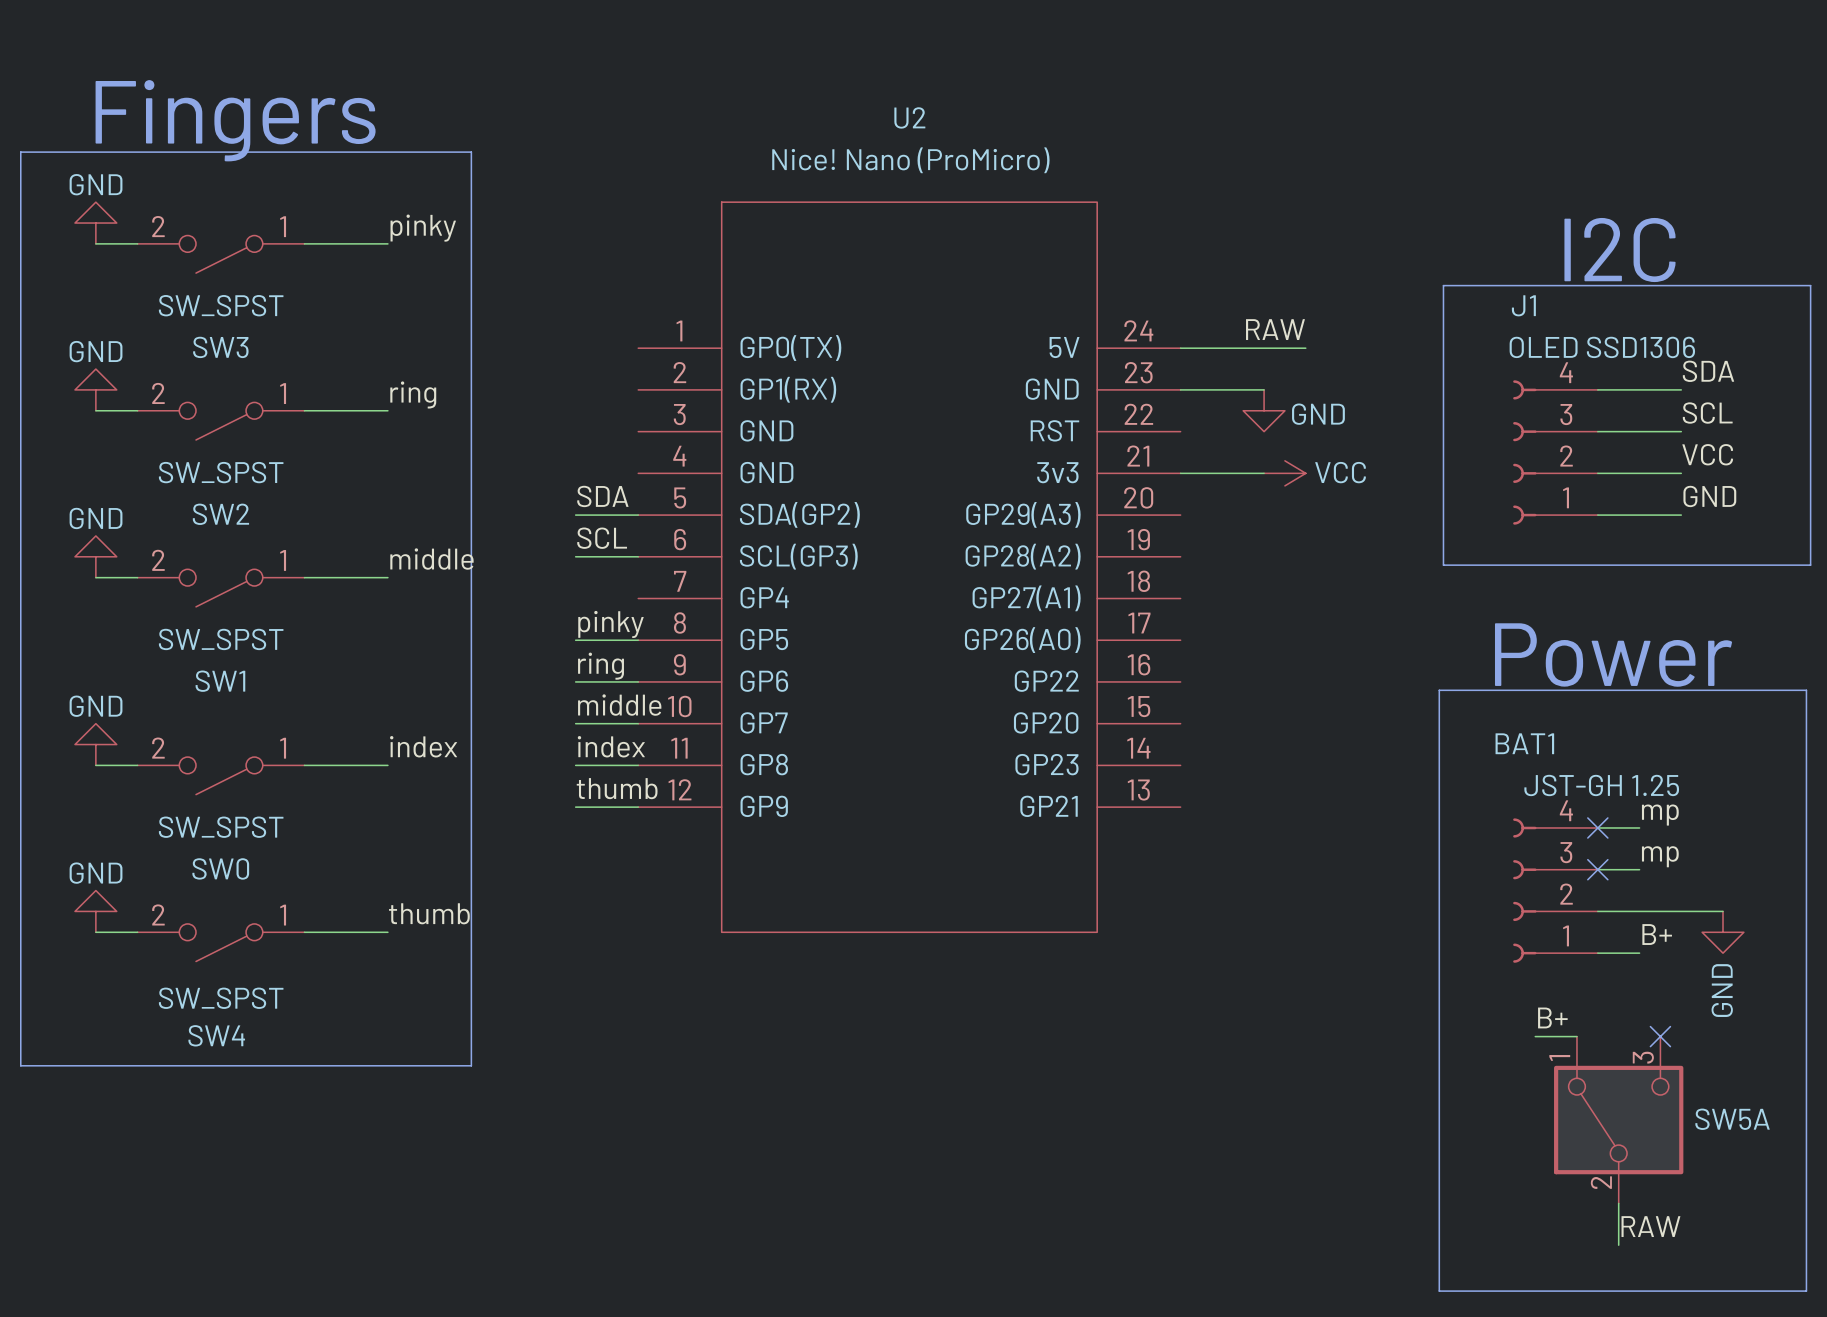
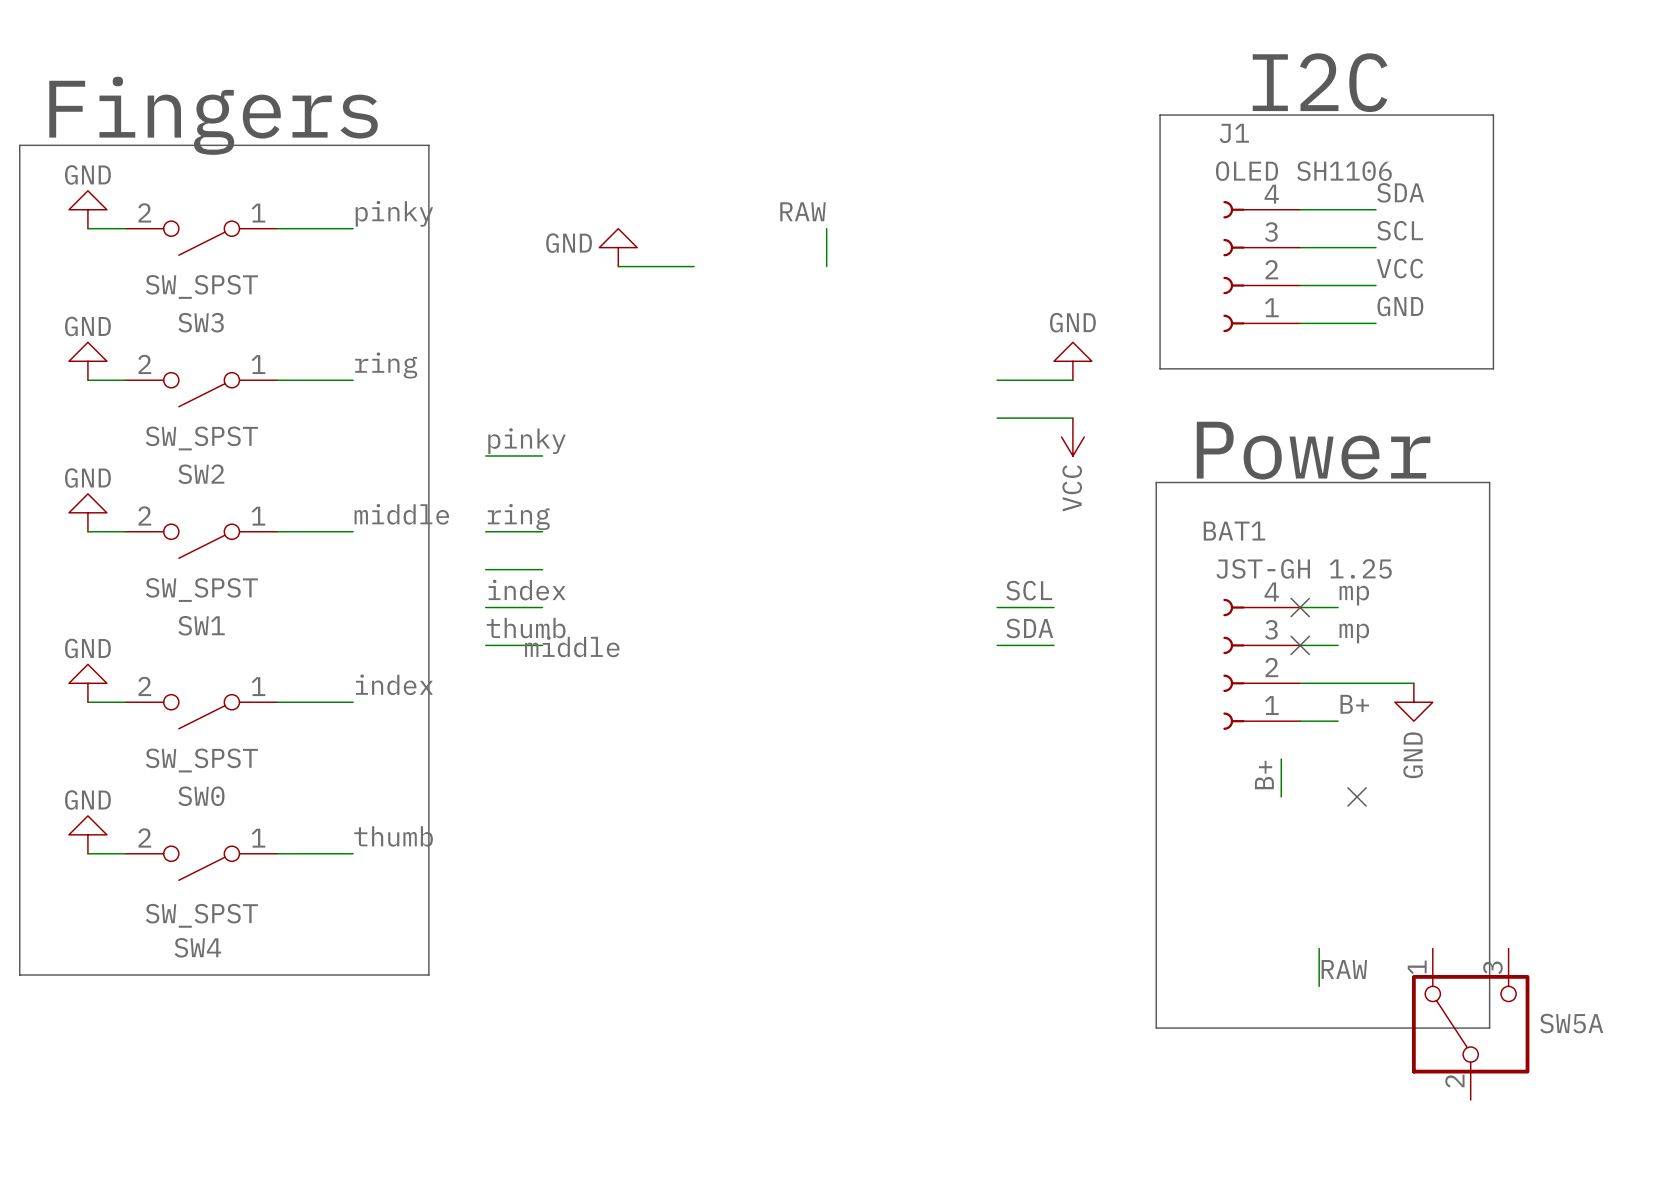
wire: none -> (826, 228) (826, 266)
text position: I2C (1620, 250) -> I2C (1320, 82)
power symbol: none -> GND (618, 247)
wire: none -> (618, 266) (694, 266)
line: (1443, 285) (1810, 285) (1810, 565) (1443, 565) (1443, 285) -> (1160, 115) (1493, 115) (1493, 368) (1160, 368) (1160, 115)
label position: RAW (1275, 329) -> RAW (802, 211)
J1 value: OLED SSD1306 (1602, 347) -> OLED SH1106 (1303, 171)
wire: (1180, 348) (1305, 348) -> none
label position: SDA (1708, 371) -> SDA (1400, 192)
wire: (1180, 389) (1264, 389) -> (997, 380) (1072, 380)
wire: (1597, 389) (1681, 389) -> (1300, 209) (1375, 209)
power symbol rotation: 0° (1264, 410) -> 180° (1072, 361)
power symbol position: GND (1264, 410) -> GND (1072, 361)
label position: SCL (1707, 413) -> SCL (1400, 230)
power symbol text position: GND (1318, 414) -> GND (1072, 322)
wire: (1597, 431) (1681, 431) -> (1300, 247) (1375, 247)
J1 position: (1555, 452) -> (1261, 266)
label position: VCC (1707, 454) -> VCC (1400, 268)
wire: (1180, 473) (1264, 473) -> (997, 418) (1072, 418)
power symbol rotation: 0° (1284, 473) -> 90° clockwise (1072, 437)
power symbol position: VCC (1284, 473) -> VCC (1072, 437)
wire: (1597, 473) (1681, 473) -> (1300, 285) (1375, 285)
label: SDA (602, 496) -> none
label position: GND (1709, 496) -> GND (1400, 306)
wire: (575, 515) (638, 515) -> none
wire: (1597, 515) (1681, 515) -> (1300, 323) (1375, 323)
label: SCL (602, 538) -> none
wire: (575, 556) (638, 556) -> (485, 455) (542, 455)
U2: Nice! Nano (ProMicro) (909, 567) -> none
label position: pinky (611, 624) -> pinky (526, 441)
wire: (575, 640) (638, 640) -> (485, 531) (542, 531)
label: none -> SCL (1029, 590)
label: none -> mp (1354, 595)
text position: Power (1613, 655) -> Power (1313, 450)
wire: none -> (997, 607) (1053, 607)
no-connect mark: none -> (1300, 607)
label position: ring (601, 666) -> ring (518, 517)
wire: (575, 681) (638, 681) -> (485, 569) (542, 569)
label: none -> SDA (1029, 628)
label: none -> mp (1354, 633)
line: (1439, 690) (1806, 690) (1806, 1291) (1439, 1291) (1439, 690) -> (1156, 482) (1489, 482) (1489, 1028) (1156, 1028) (1156, 482)
wire: none -> (997, 645) (1053, 645)
no-connect mark: none -> (1300, 645)
wire: (575, 723) (638, 723) -> (485, 607) (542, 607)
label position: index (611, 746) -> index (527, 590)
wire: (575, 765) (638, 765) -> (485, 645) (542, 645)
power symbol: none -> GND (1413, 702)
label: none -> B+ (1354, 704)
label position: thumb (617, 788) -> thumb (526, 628)
wire: (575, 807) (638, 807) -> none
label: mp (1660, 815) -> none
wire: none -> (1281, 759) (1281, 796)
wire: (1597, 827) (1639, 827) -> (1300, 607) (1338, 607)
no-connect mark: (1597, 827) -> none
label: none -> B+ (1264, 774)
label: mp (1660, 856) -> none
no-connect mark: none -> (1357, 796)
wire: (1597, 869) (1639, 869) -> (1300, 645) (1338, 645)
no-connect mark: (1597, 869) -> none
BAT1 position: (1555, 890) -> (1261, 664)
wire: (1597, 911) (1723, 911) -> (1300, 683) (1413, 683)
power symbol: GND (1723, 932) -> none
label: B+ (1657, 934) -> none
wire: (1597, 953) (1639, 953) -> (1300, 721) (1338, 721)
label: B+ (1552, 1017) -> none
wire: (1535, 1036) (1576, 1036) -> none
no-connect mark: (1660, 1036) -> none
wire: (1618, 1203) (1618, 1245) -> (1319, 948) (1319, 986)
label position: RAW (1650, 1226) -> RAW (1344, 969)

